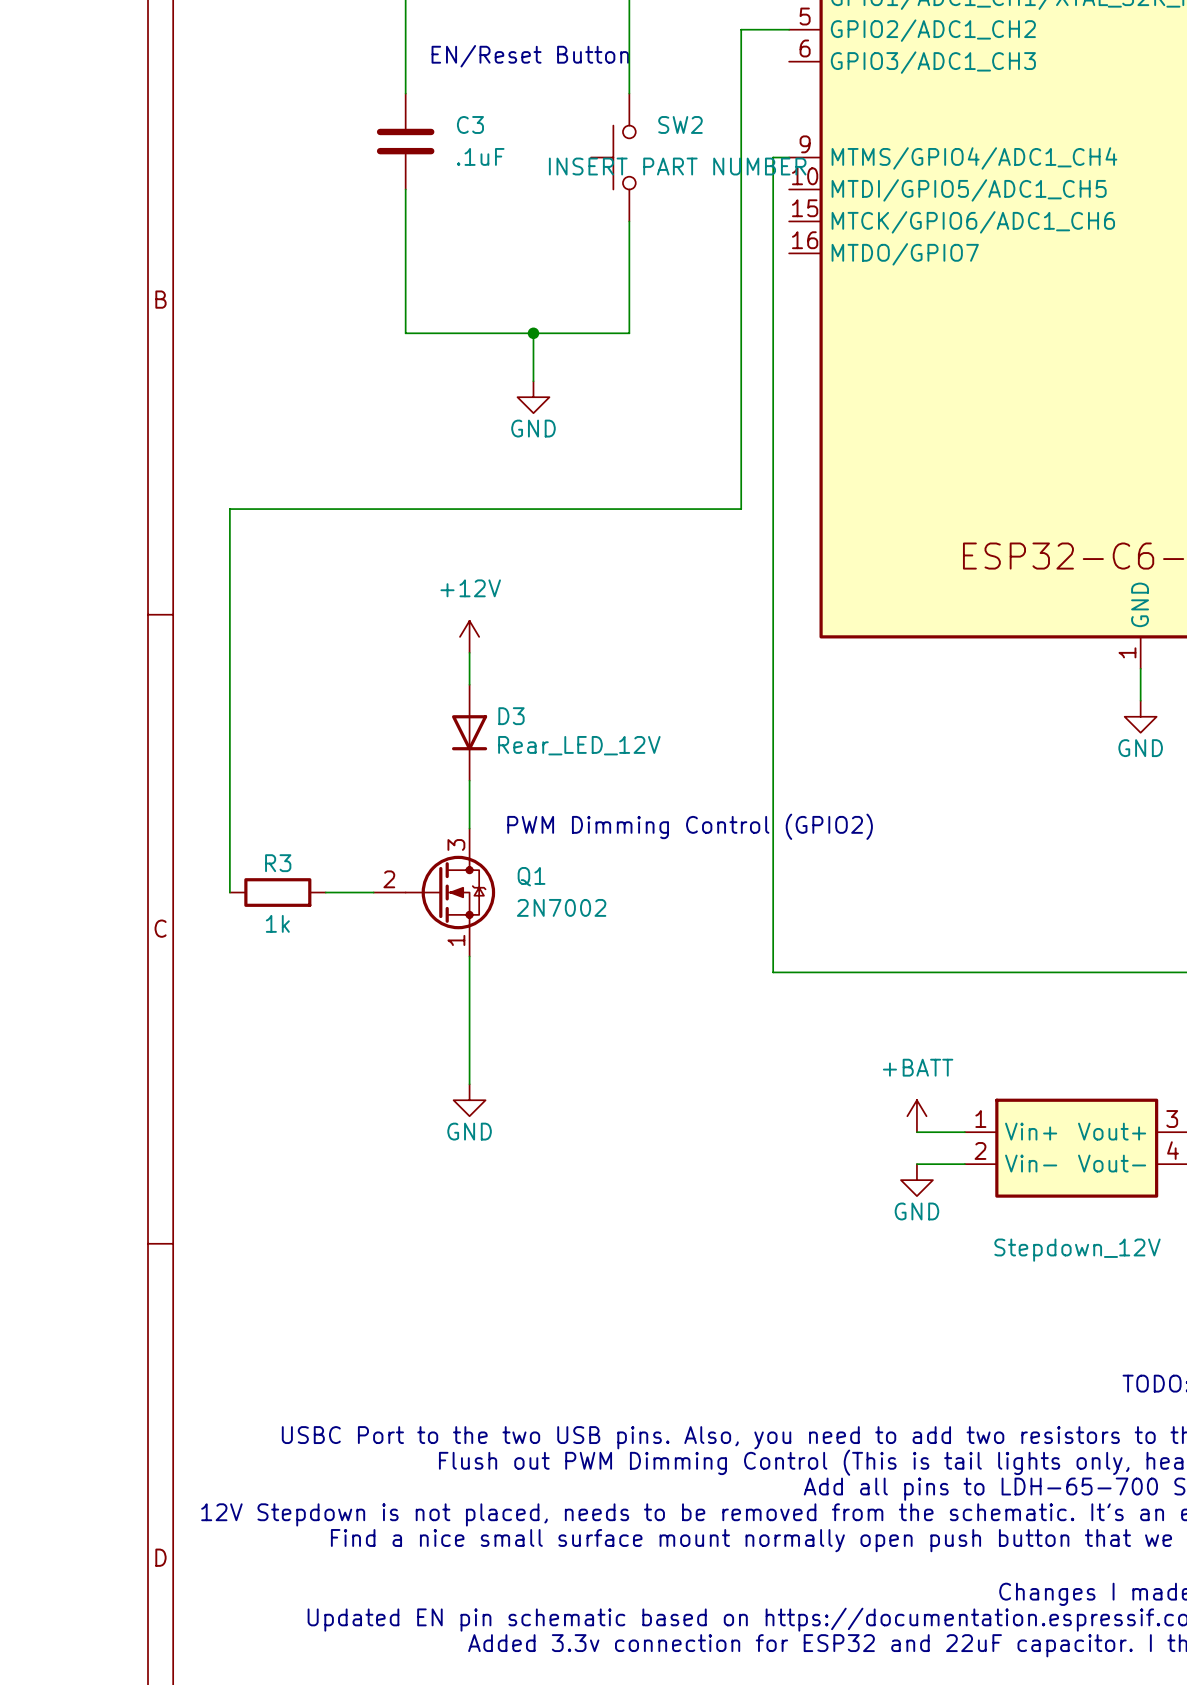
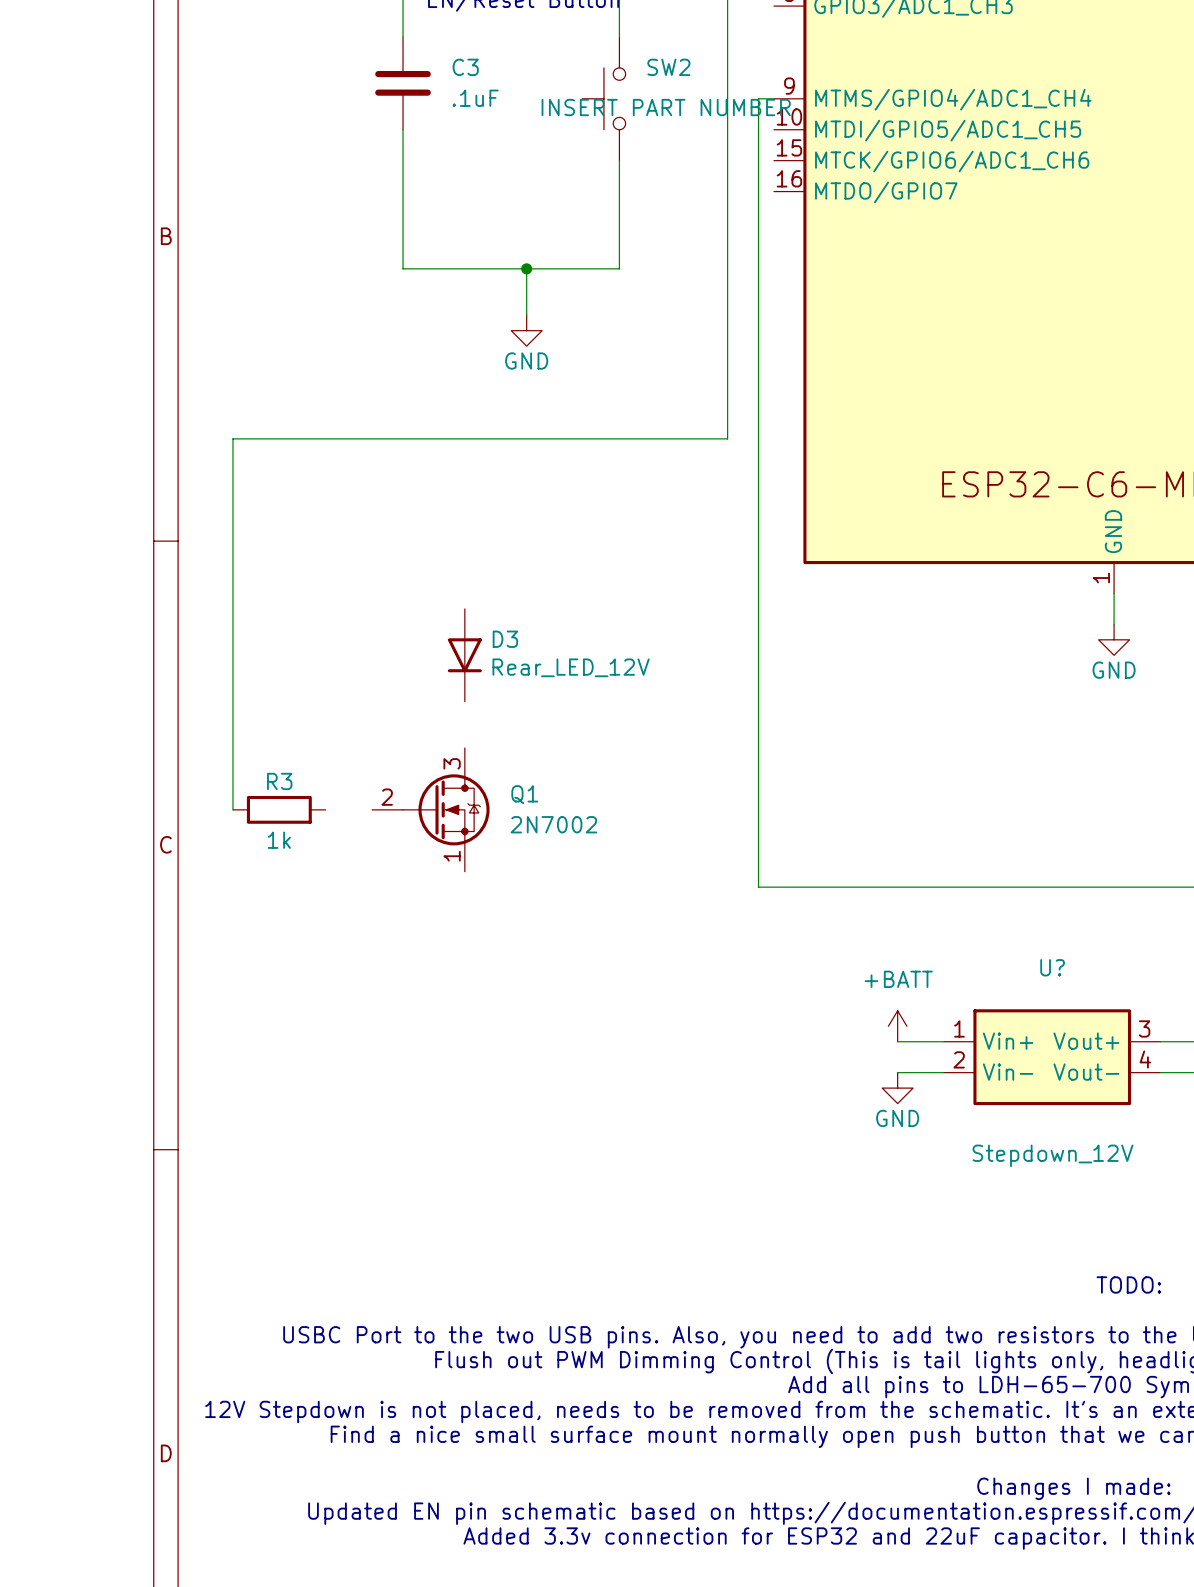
power symbol: +12V (469, 636) -> none
wire: (469, 652) (469, 684) -> none
wire: (469, 780) (469, 828) -> none
text: PWM Dimming Control (GPIO2) (690, 826) -> none
wire: (325, 892) (373, 892) -> none
wire: (469, 956) (469, 1084) -> none
U? name: none -> U? (1052, 967)
power symbol: GND (469, 1100) -> none

